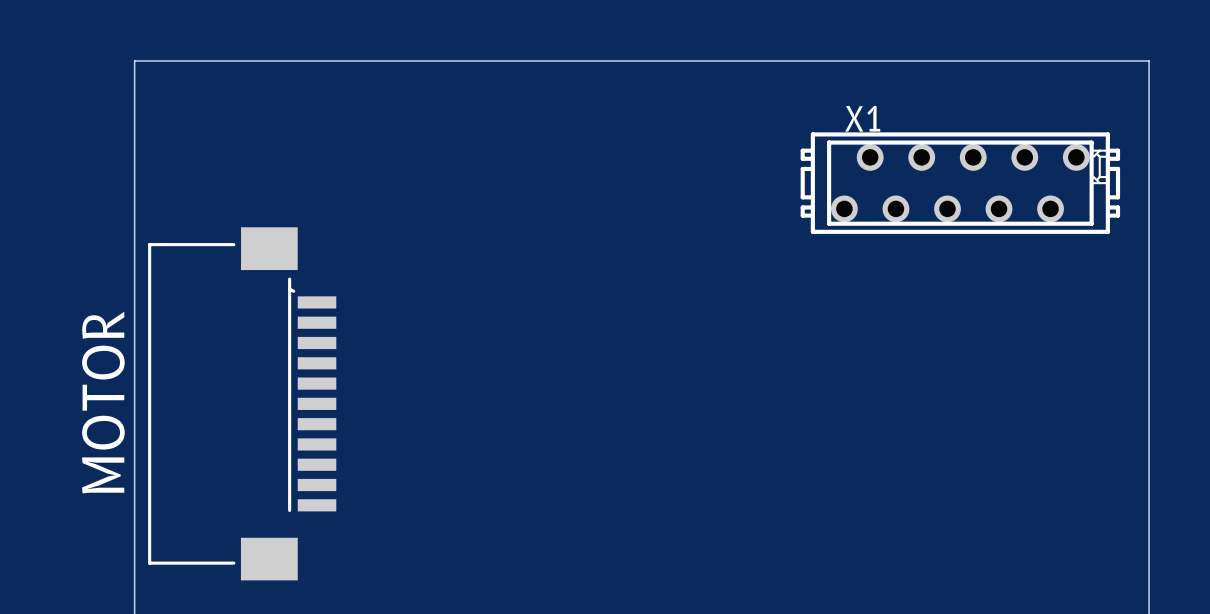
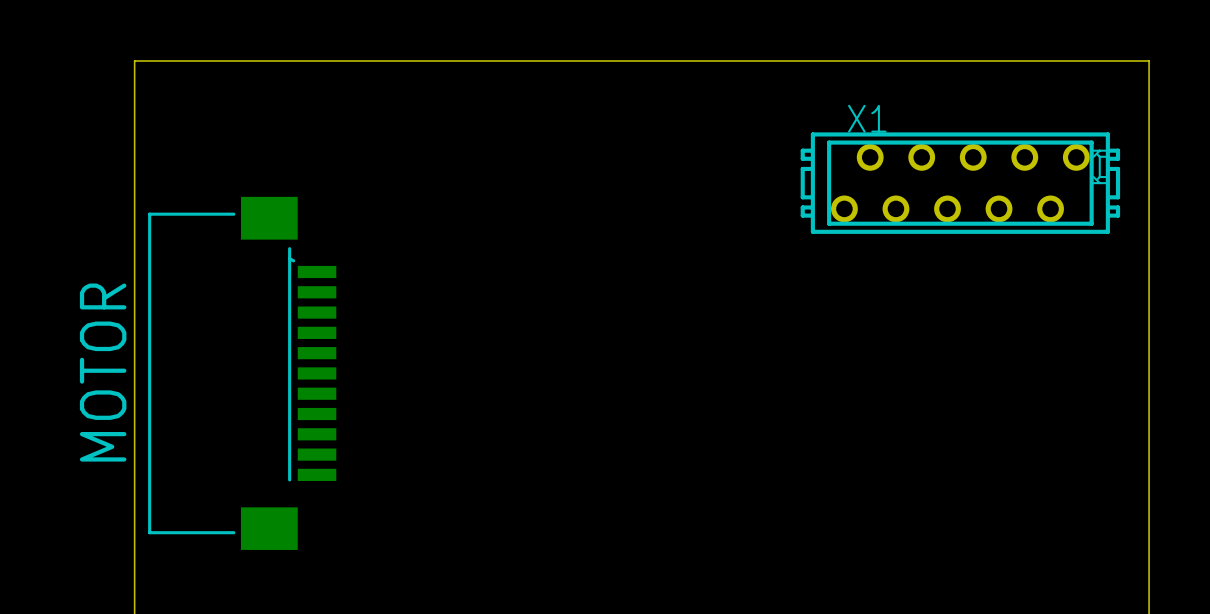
MOTOR position: (242, 403) -> (242, 373)

